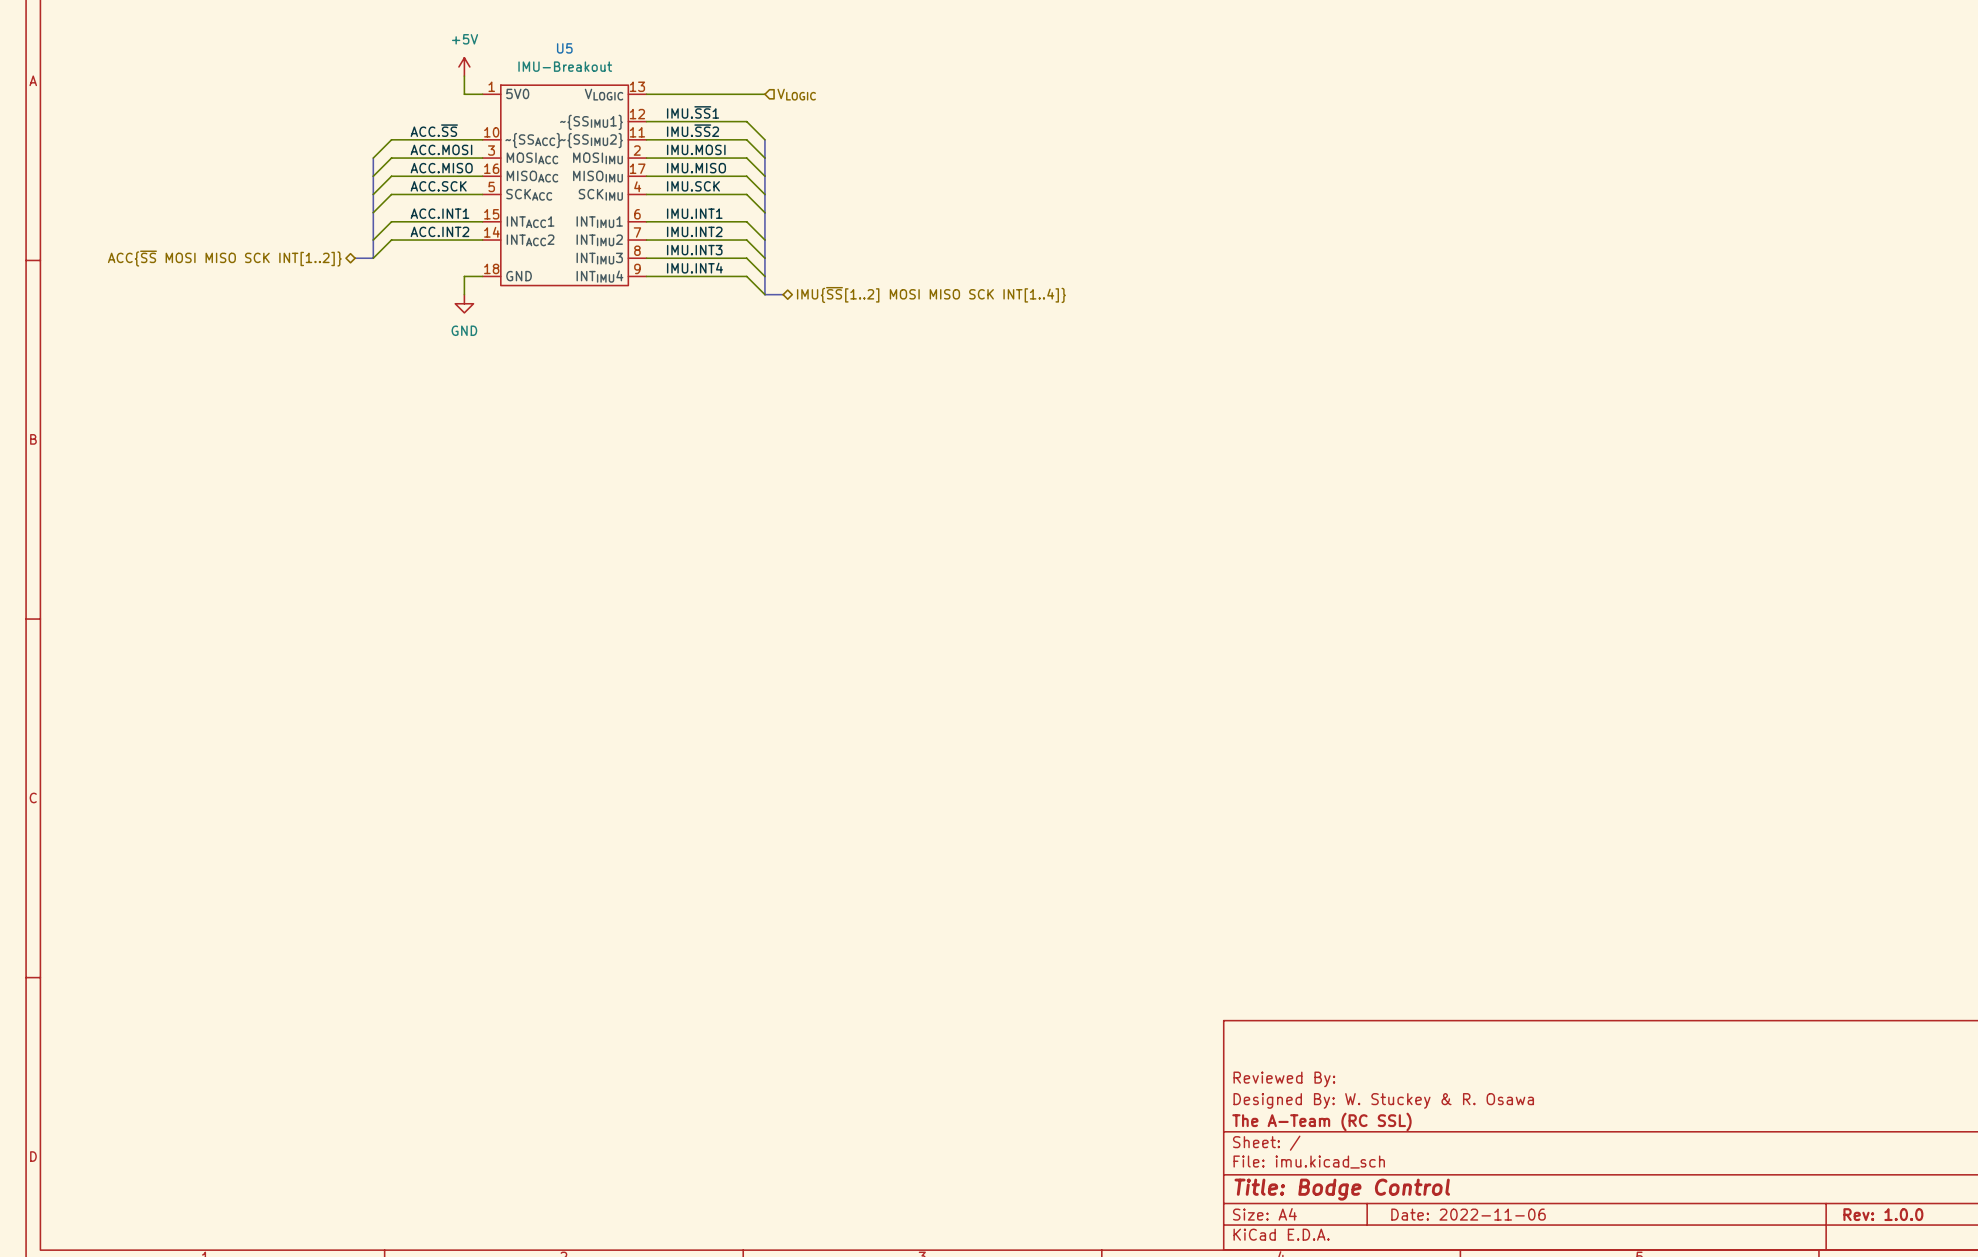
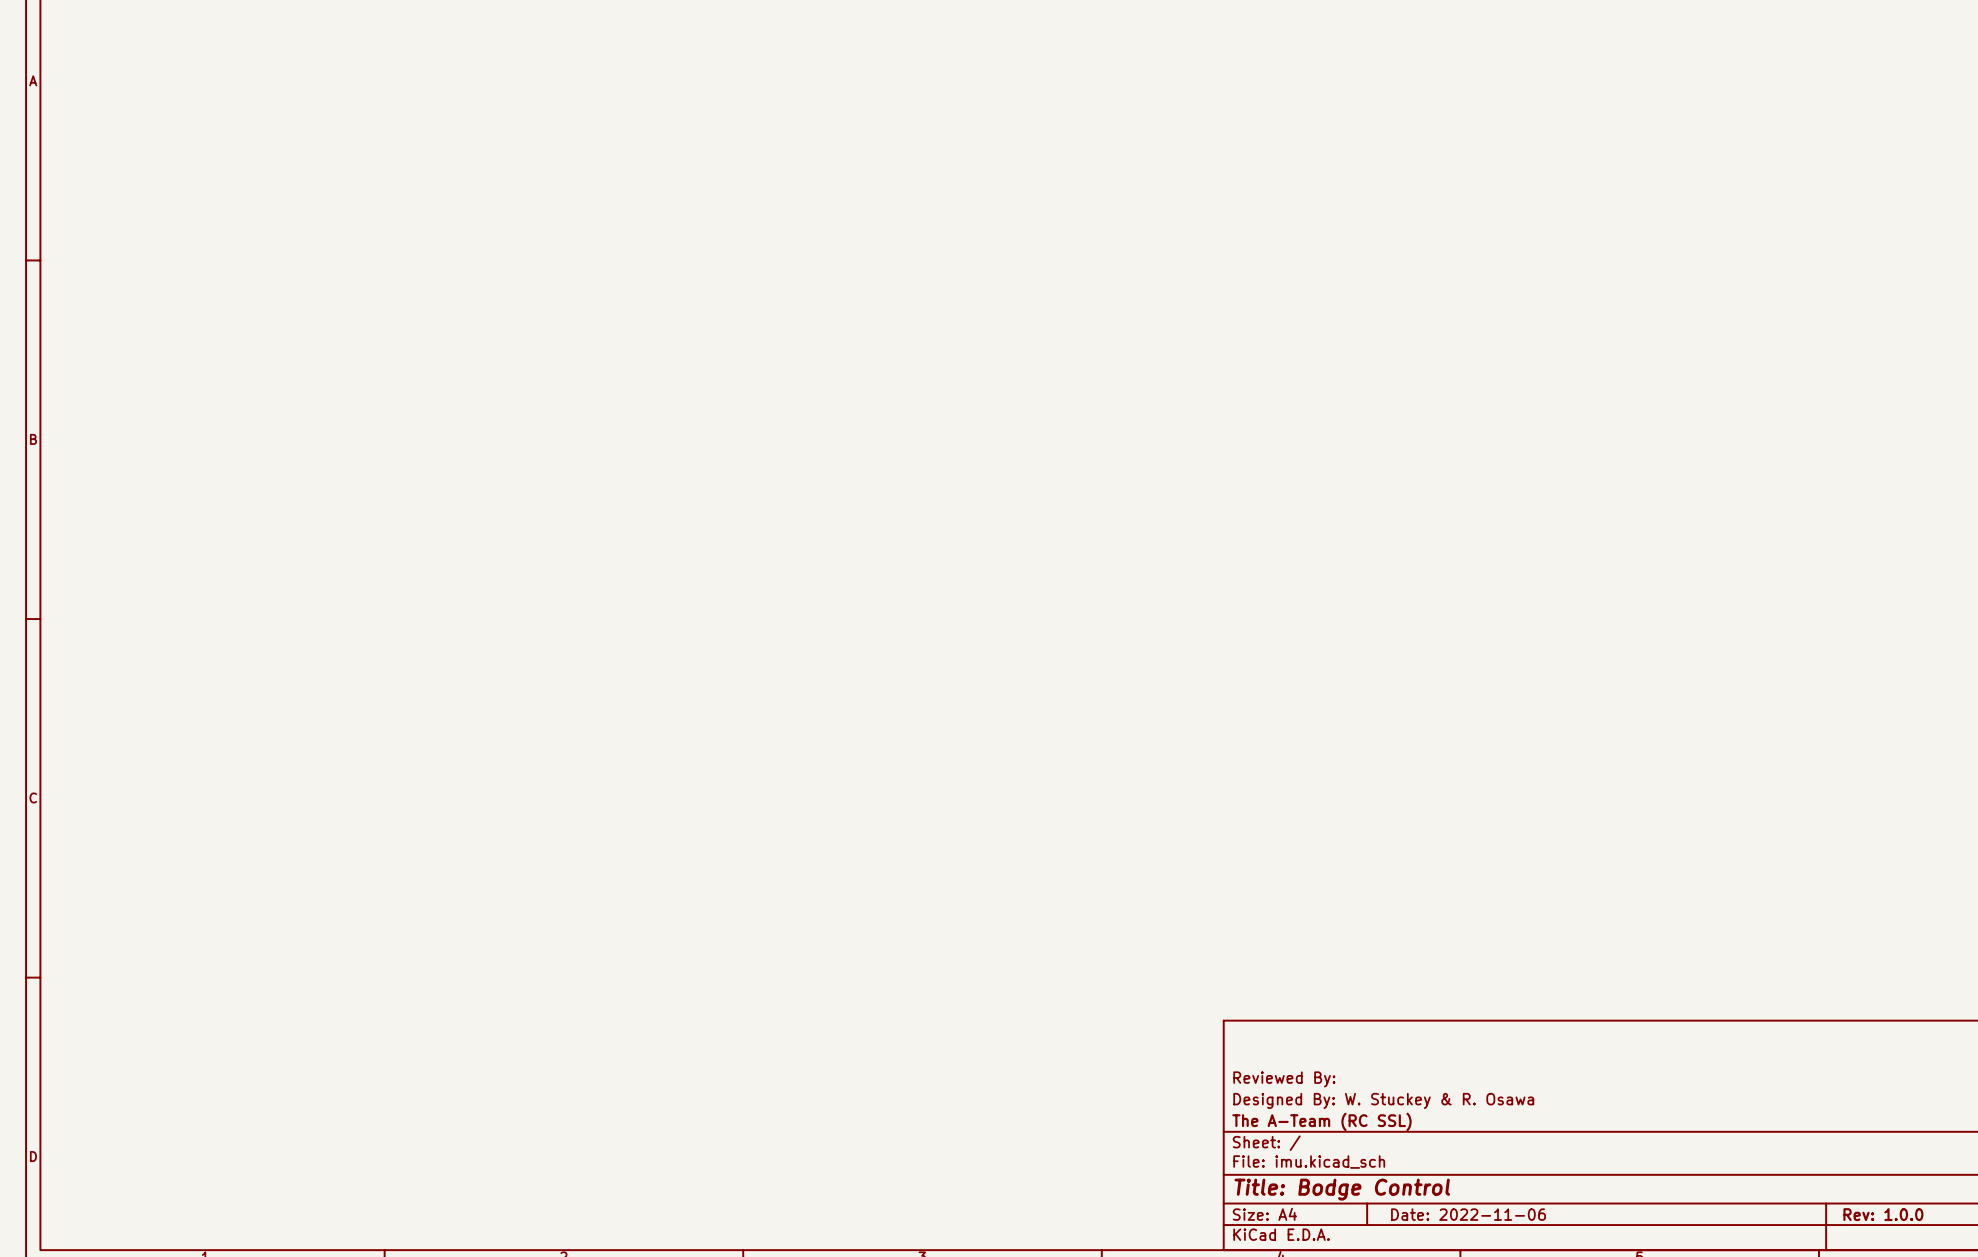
power symbol: +5V (464, 66) -> none
wire: (464, 76) (464, 94) (482, 94) -> none
wire: (646, 94) (764, 94) -> none
hierarchical label: VLOGIC (796, 94) -> none
label: IMU.~{SS}1 (693, 112) -> none
wire: (646, 121) (746, 121) (764, 139) -> none
label: ACC.~{SS} (434, 130) -> none
label: IMU.~{SS}2 (693, 130) -> none
wire: (482, 139) (391, 139) (373, 158) -> none
wire: (646, 139) (746, 139) (764, 158) -> none
bus: (764, 139) (764, 294) (783, 294) -> none
label: ACC.MOSI (441, 149) -> none
label: IMU.MOSI (696, 149) -> none
bus: (373, 158) (373, 258) (355, 258) -> none
wire: (482, 158) (391, 158) (373, 176) -> none
wire: (646, 158) (746, 158) (764, 176) -> none
label: ACC.MISO (441, 168) -> none
label: IMU.MISO (696, 168) -> none
wire: (482, 176) (391, 176) (373, 194) -> none
wire: (646, 176) (746, 176) (764, 194) -> none
U5: (564, 185) -> none
label: ACC.SCK (438, 186) -> none
label: IMU.SCK (693, 186) -> none
wire: (482, 194) (391, 194) (373, 212) -> none
wire: (646, 194) (746, 194) (764, 212) -> none
label: ACC.INT1 (439, 213) -> none
label: IMU.INT1 (694, 213) -> none
wire: (482, 221) (391, 221) (373, 240) -> none
wire: (646, 221) (746, 221) (764, 240) -> none
label: ACC.INT2 (439, 231) -> none
label: IMU.INT2 (694, 231) -> none
wire: (482, 240) (391, 240) (373, 258) -> none
wire: (646, 240) (746, 240) (764, 258) -> none
label: IMU.INT3 (694, 250) -> none
hierarchical label: ACC{~{SS} MOSI MISO SCK INT[1..2]} (224, 258) -> none
wire: (646, 258) (746, 258) (764, 276) -> none
label: IMU.INT4 (694, 268) -> none
wire: (482, 276) (464, 276) (464, 294) -> none
wire: (646, 276) (746, 276) (764, 294) -> none
hierarchical label: IMU{~{SS}[1..2] MOSI MISO SCK INT[1..4]} (931, 295) -> none
power symbol: GND (464, 303) -> none

